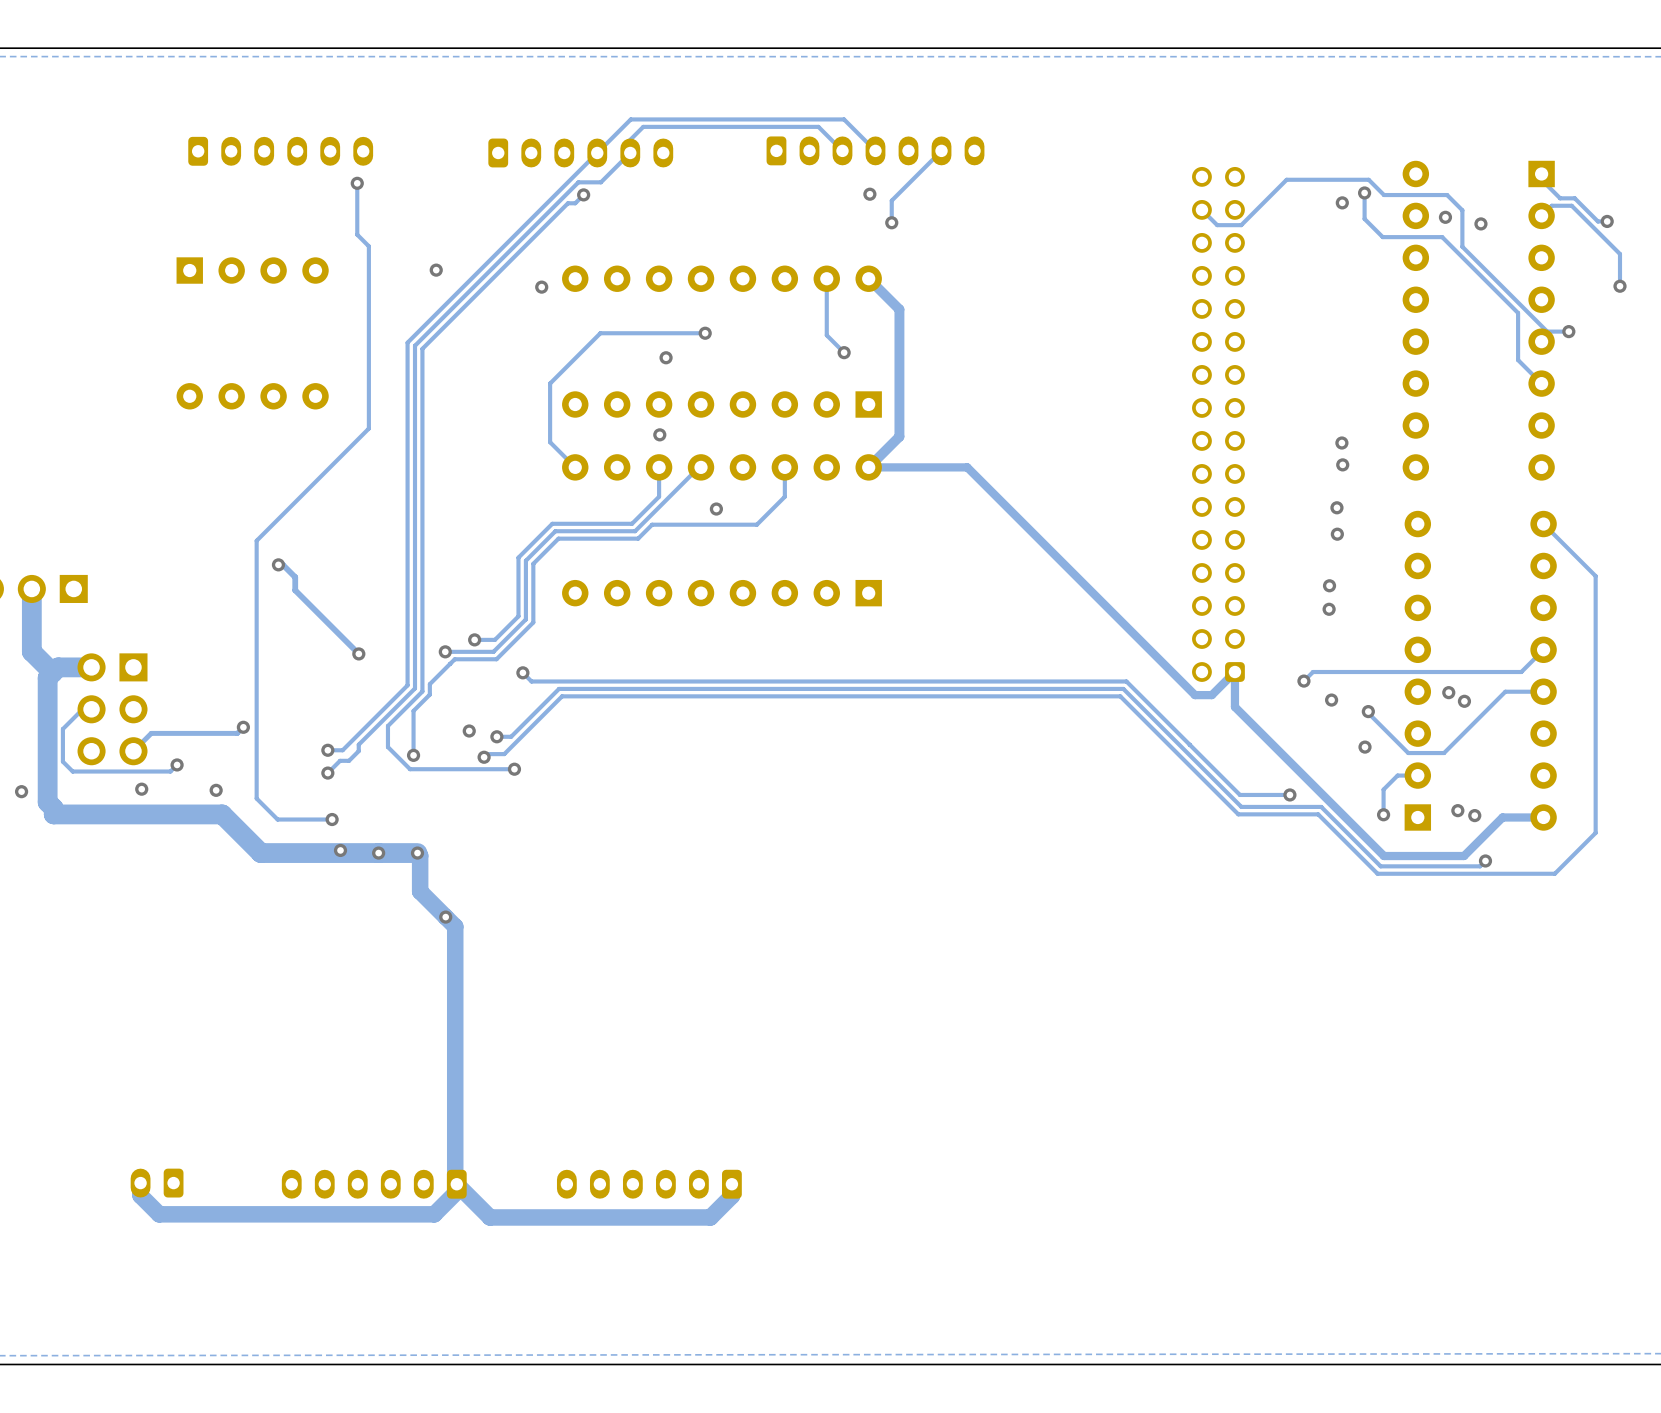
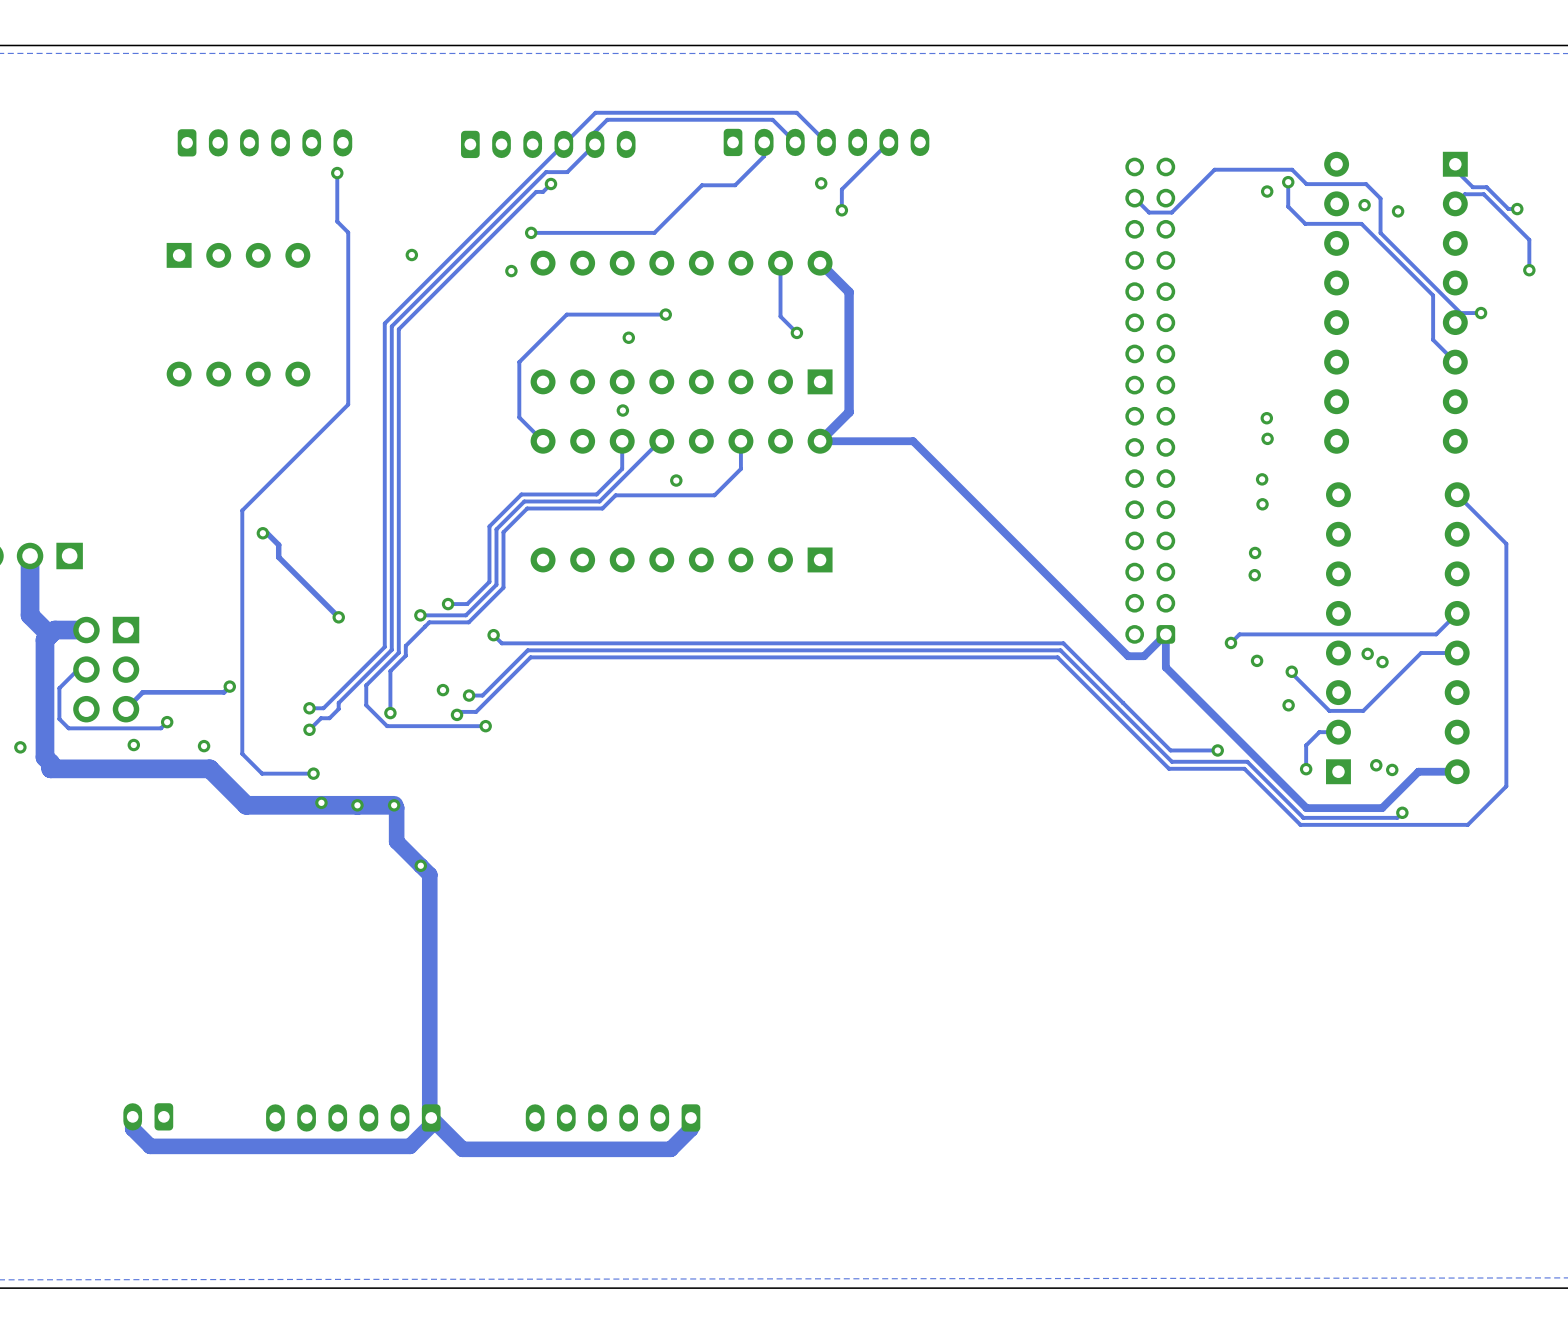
track: none -> (764, 142) (764, 156) (735, 185) (702, 185) (654, 232) (531, 232)
via: none -> (531, 232)

